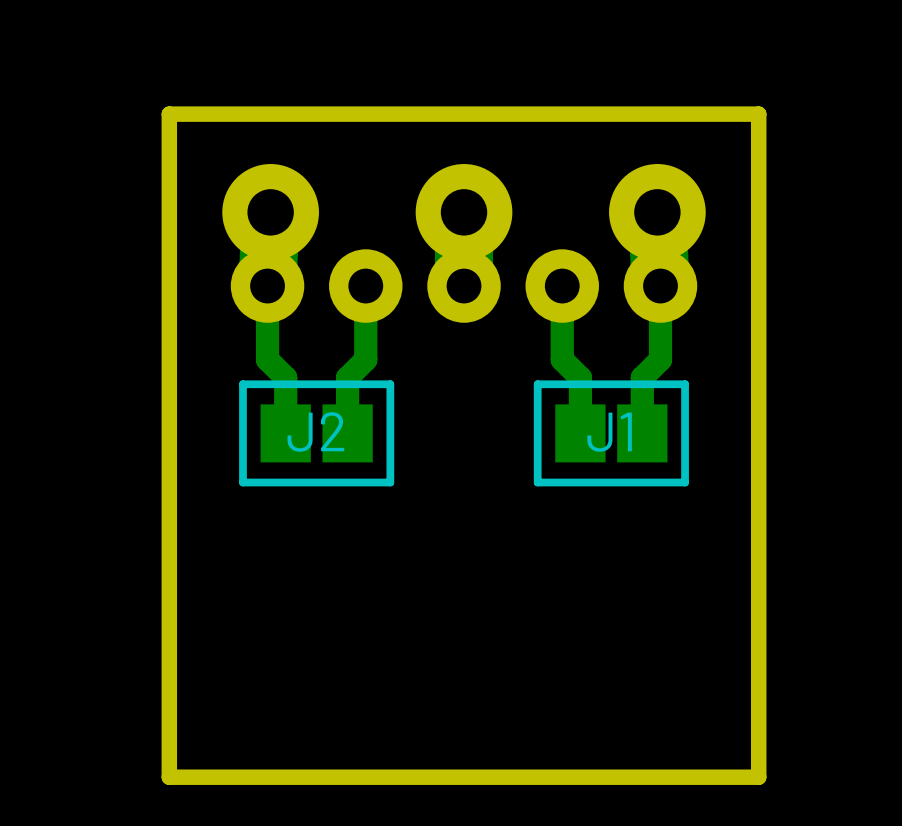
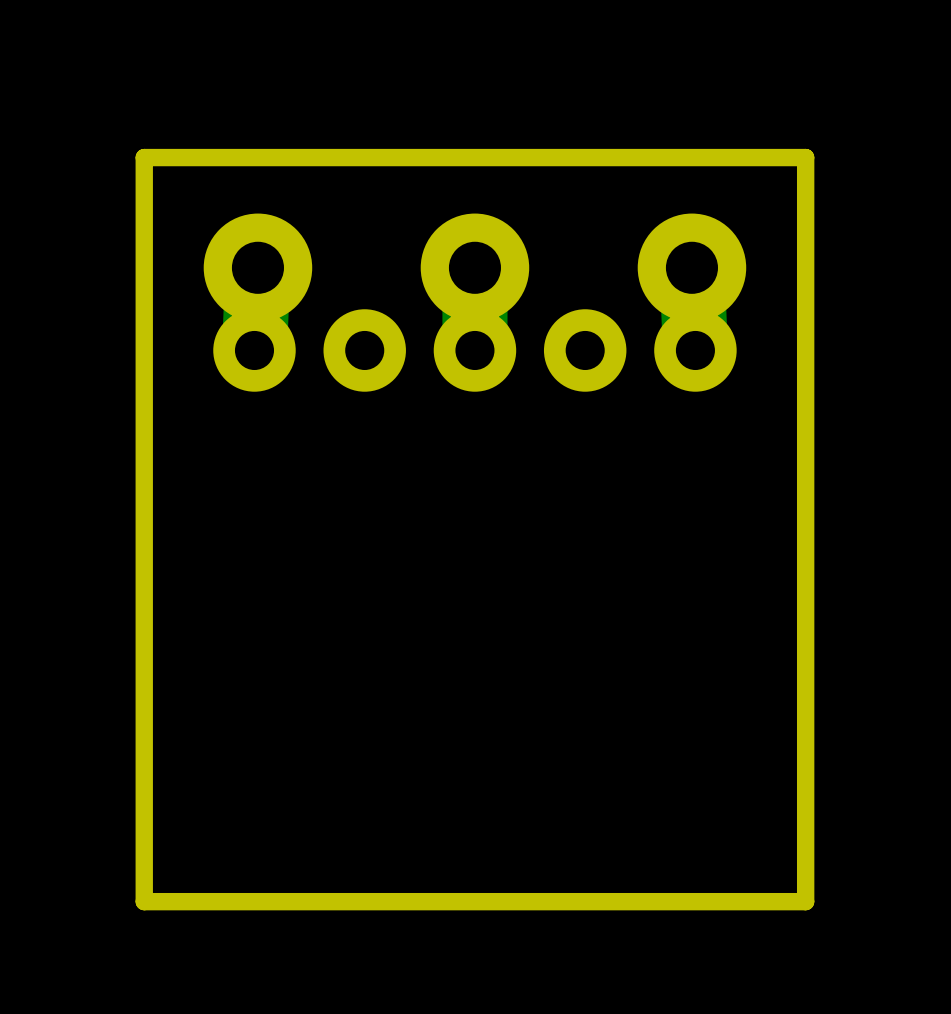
track: (267, 286) (267, 359) (285, 377) (285, 433) -> none
track: (365, 286) (365, 359) (347, 377) (347, 433) -> none
track: (562, 286) (562, 359) (580, 377) (580, 433) -> none
track: (660, 286) (660, 359) (642, 377) (642, 433) -> none
J2: (316, 433) -> none
J1: (611, 433) -> none

